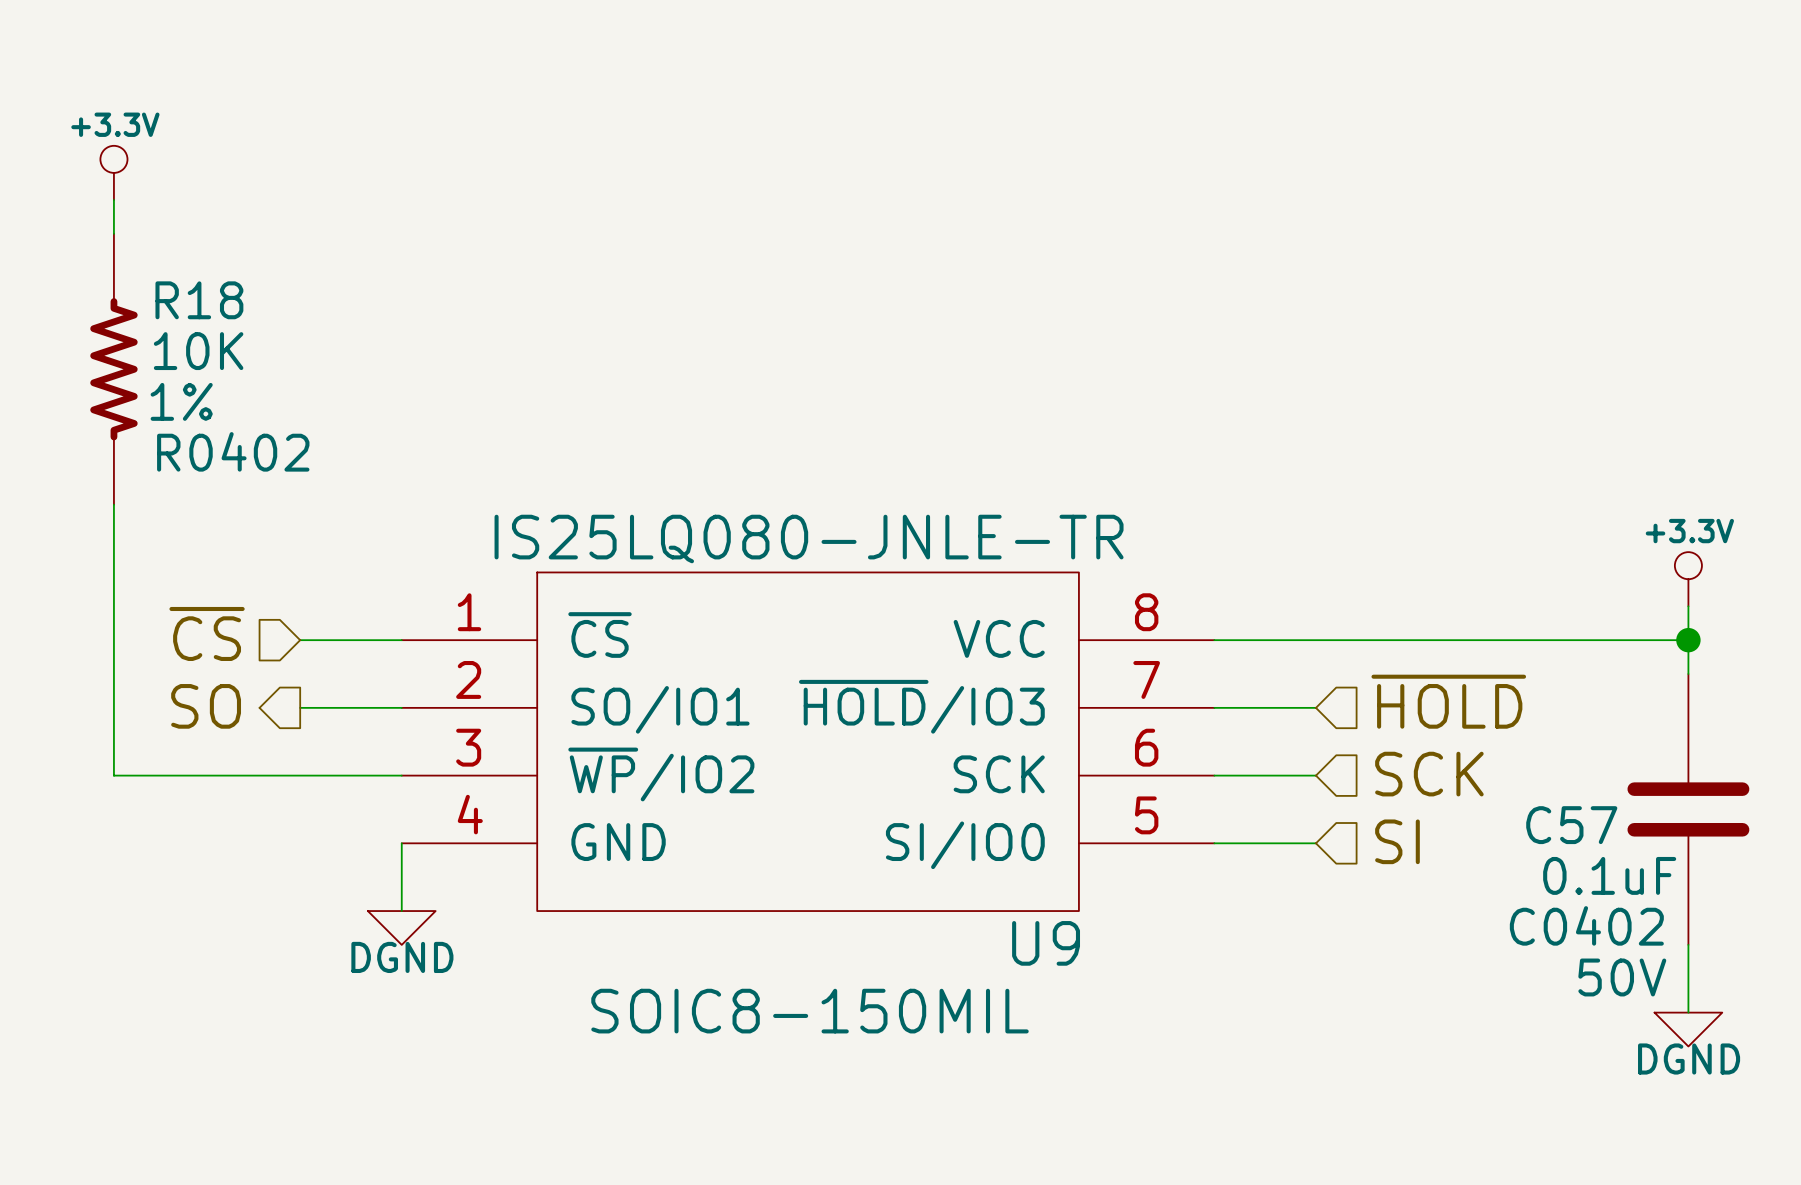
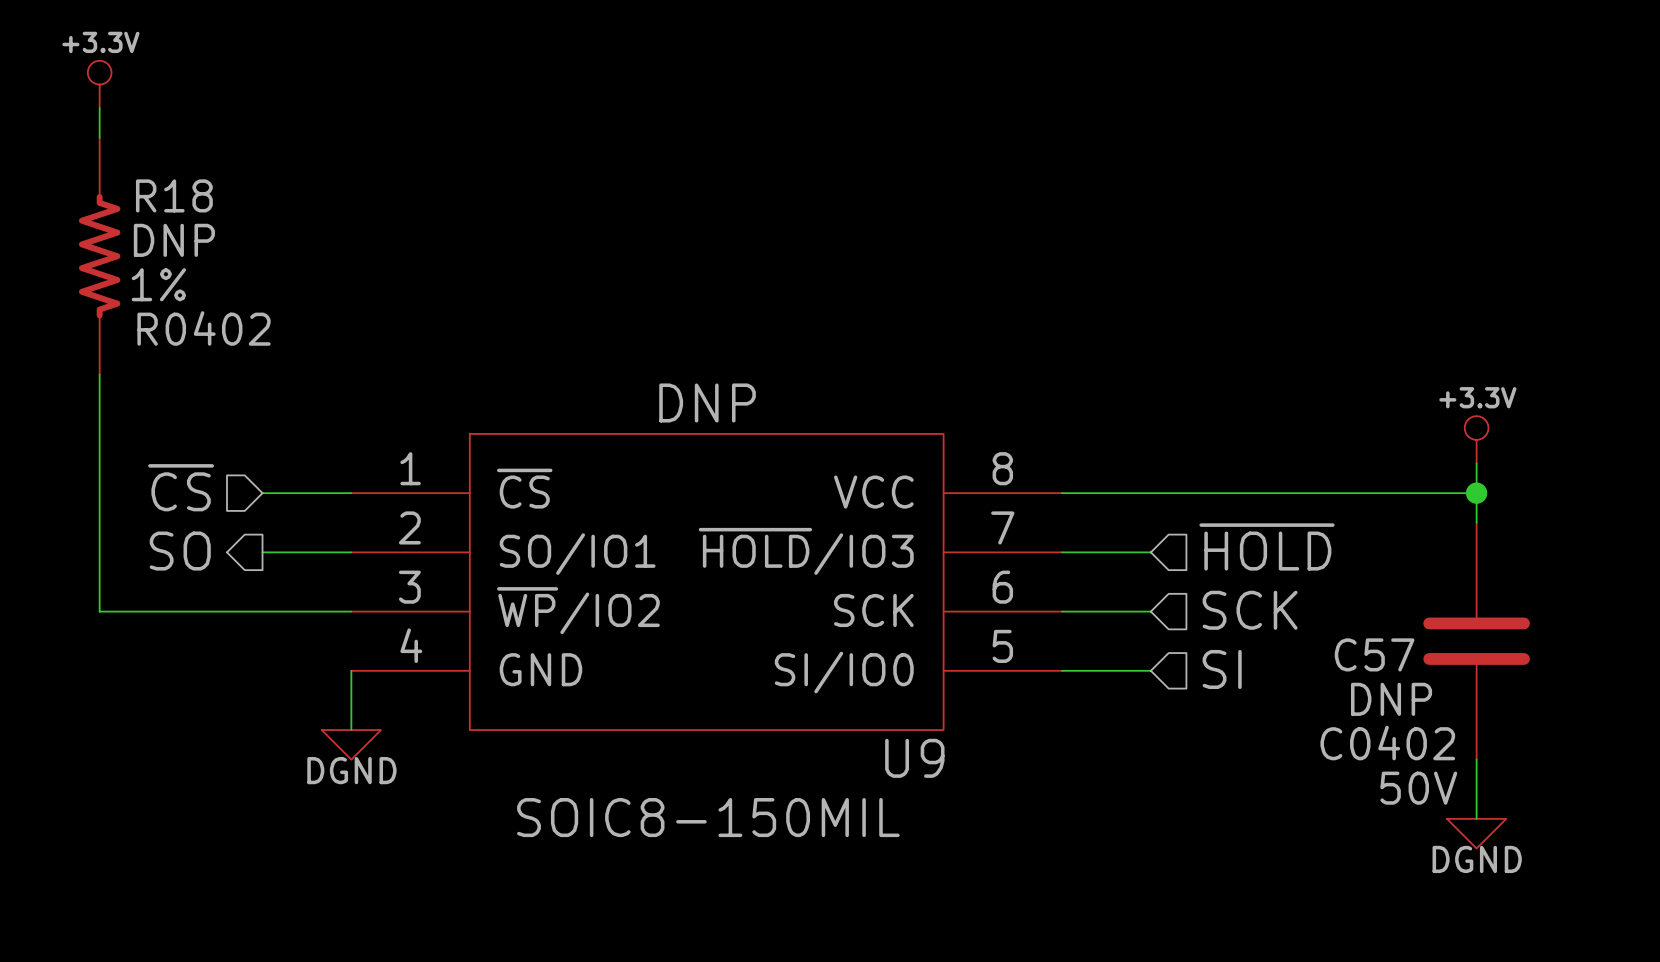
R18 value: 10K (198, 351) -> DNP (174, 240)
U9 value: IS25LQ080-JNLE-TR (809, 539) -> DNP (707, 402)
C57 value: 0.1uF (1609, 875) -> DNP (1391, 699)

